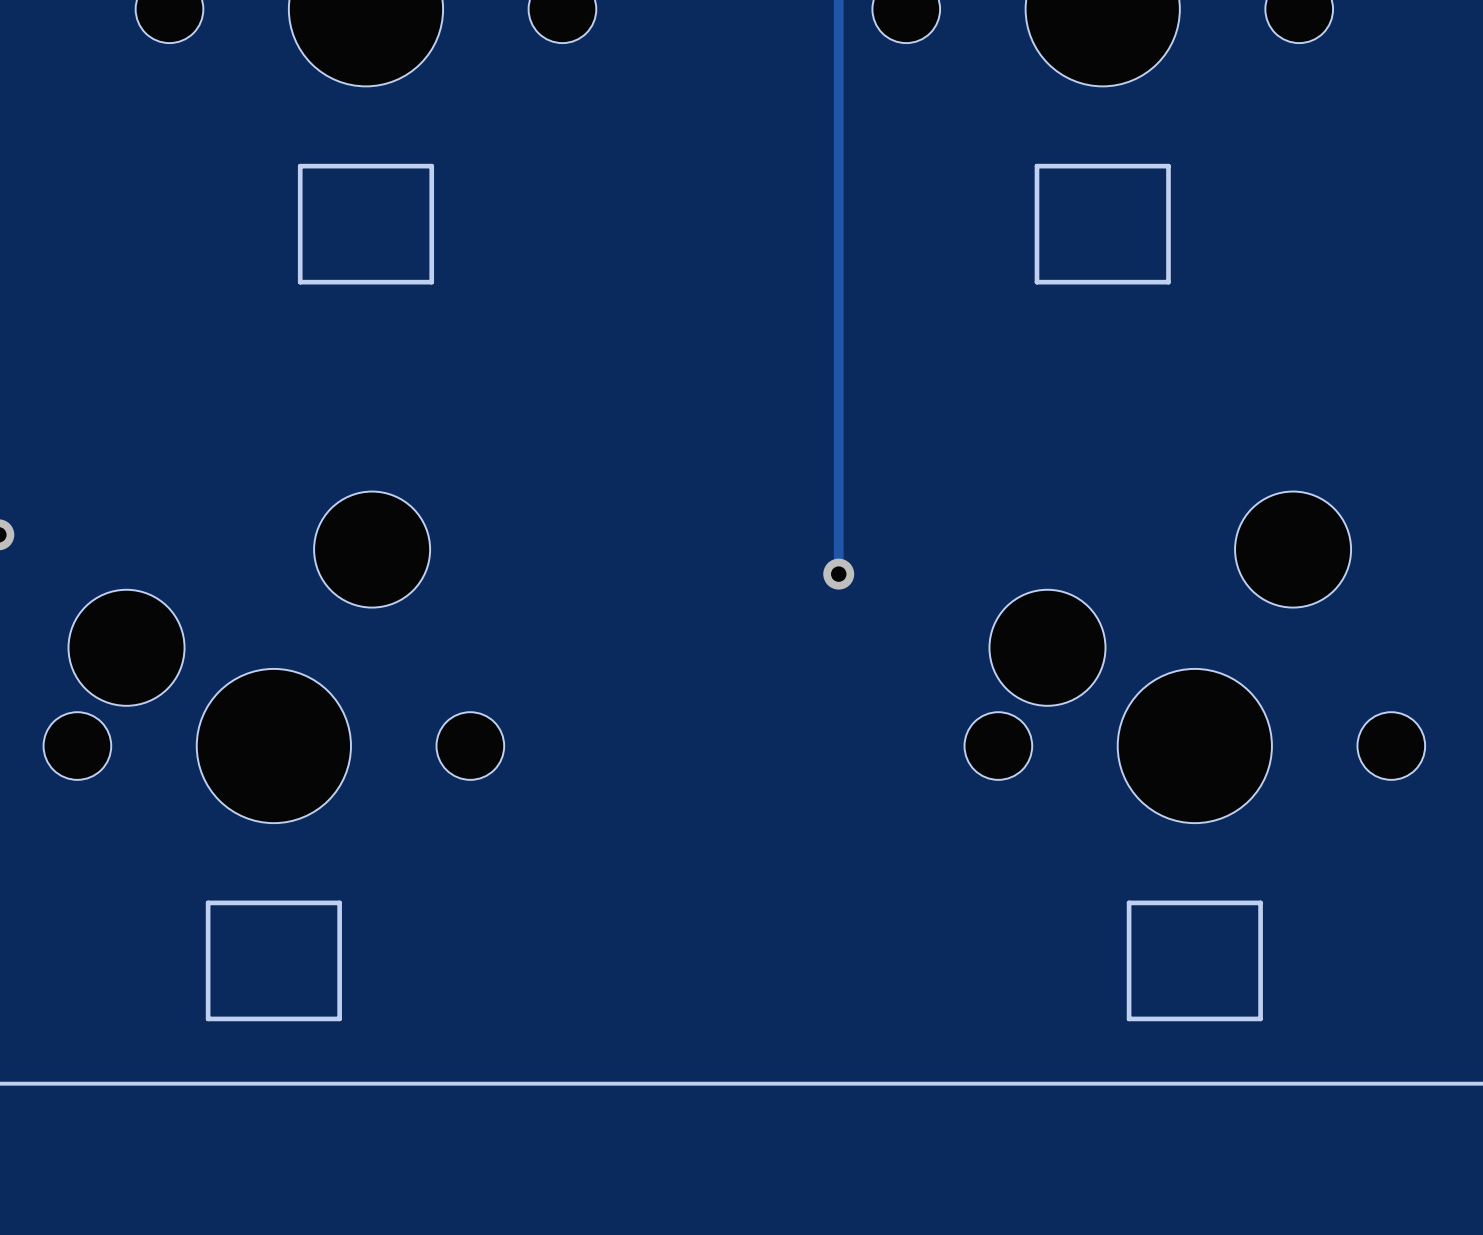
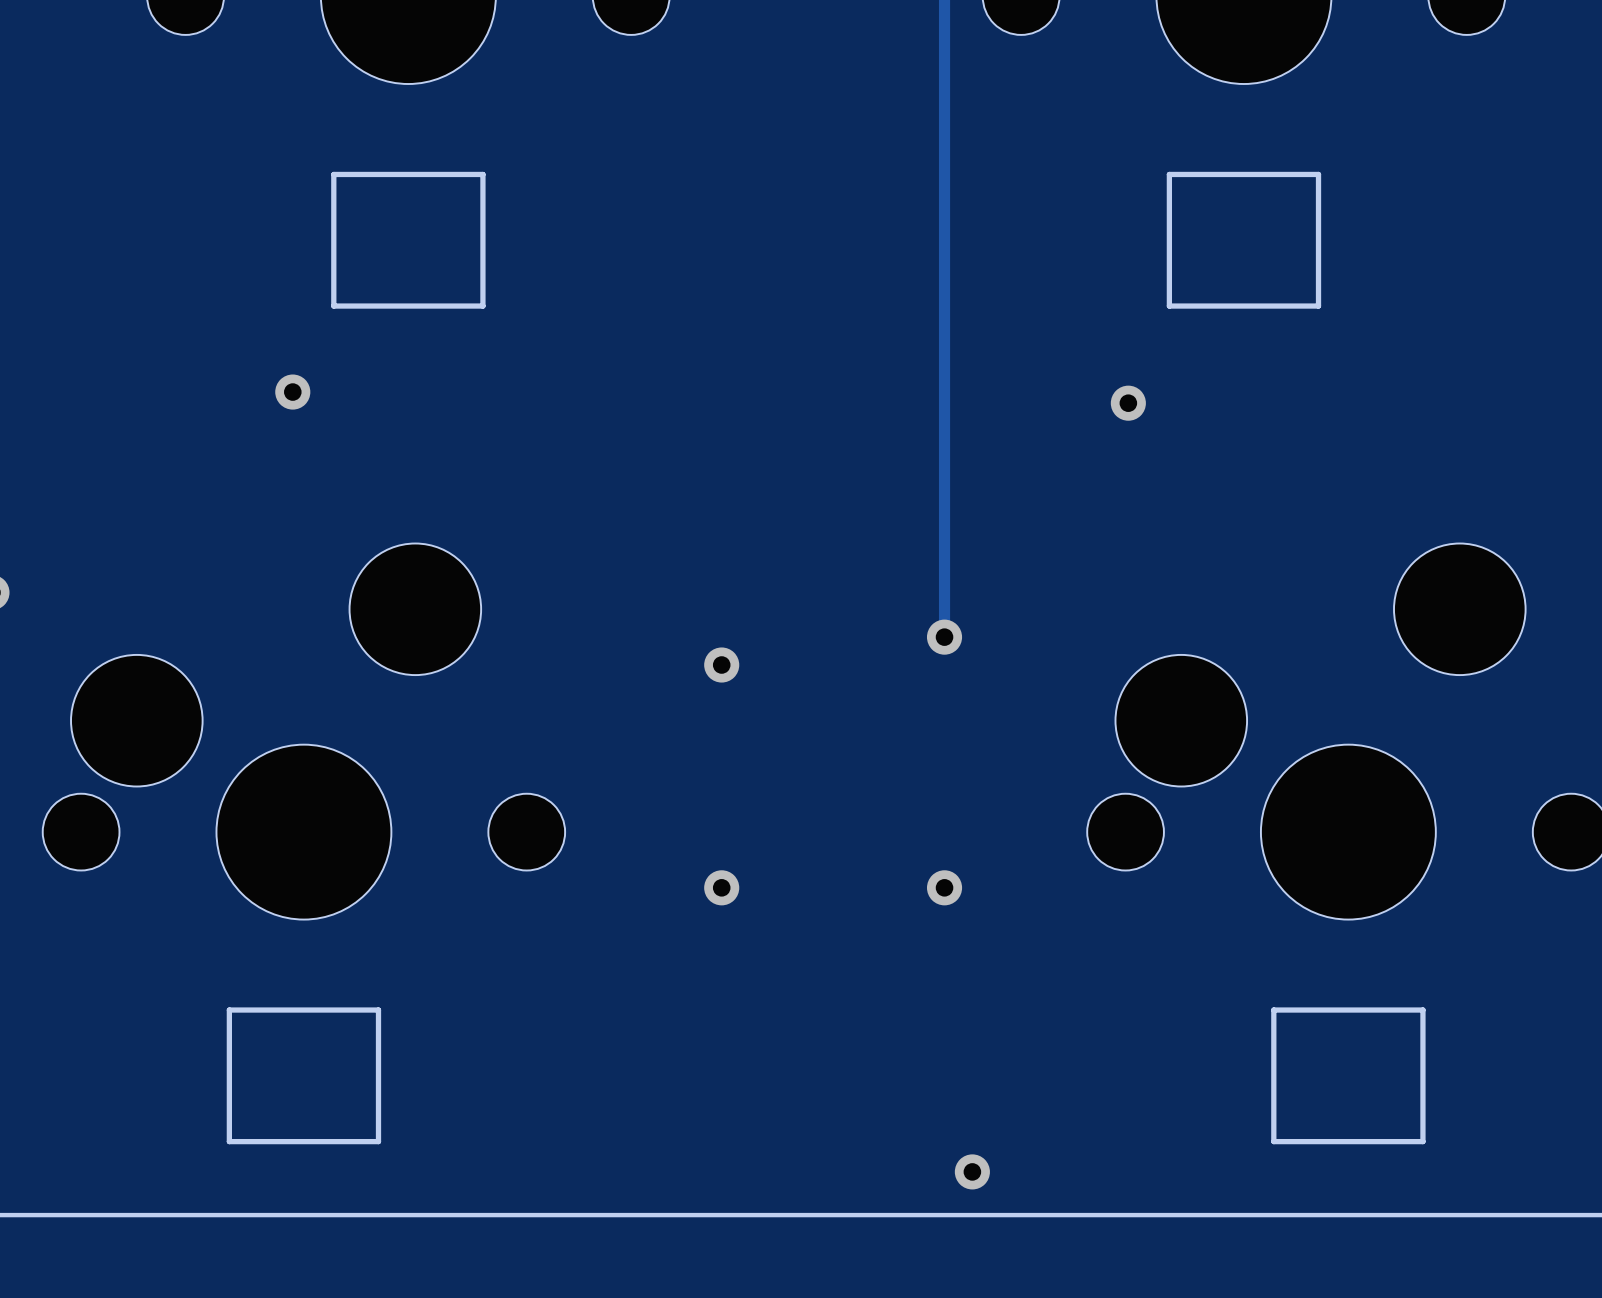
via: none -> (292, 392)
via: none -> (1128, 403)
via: none -> (721, 665)
via: none -> (721, 887)
via: none -> (944, 887)
via: none -> (972, 1171)

